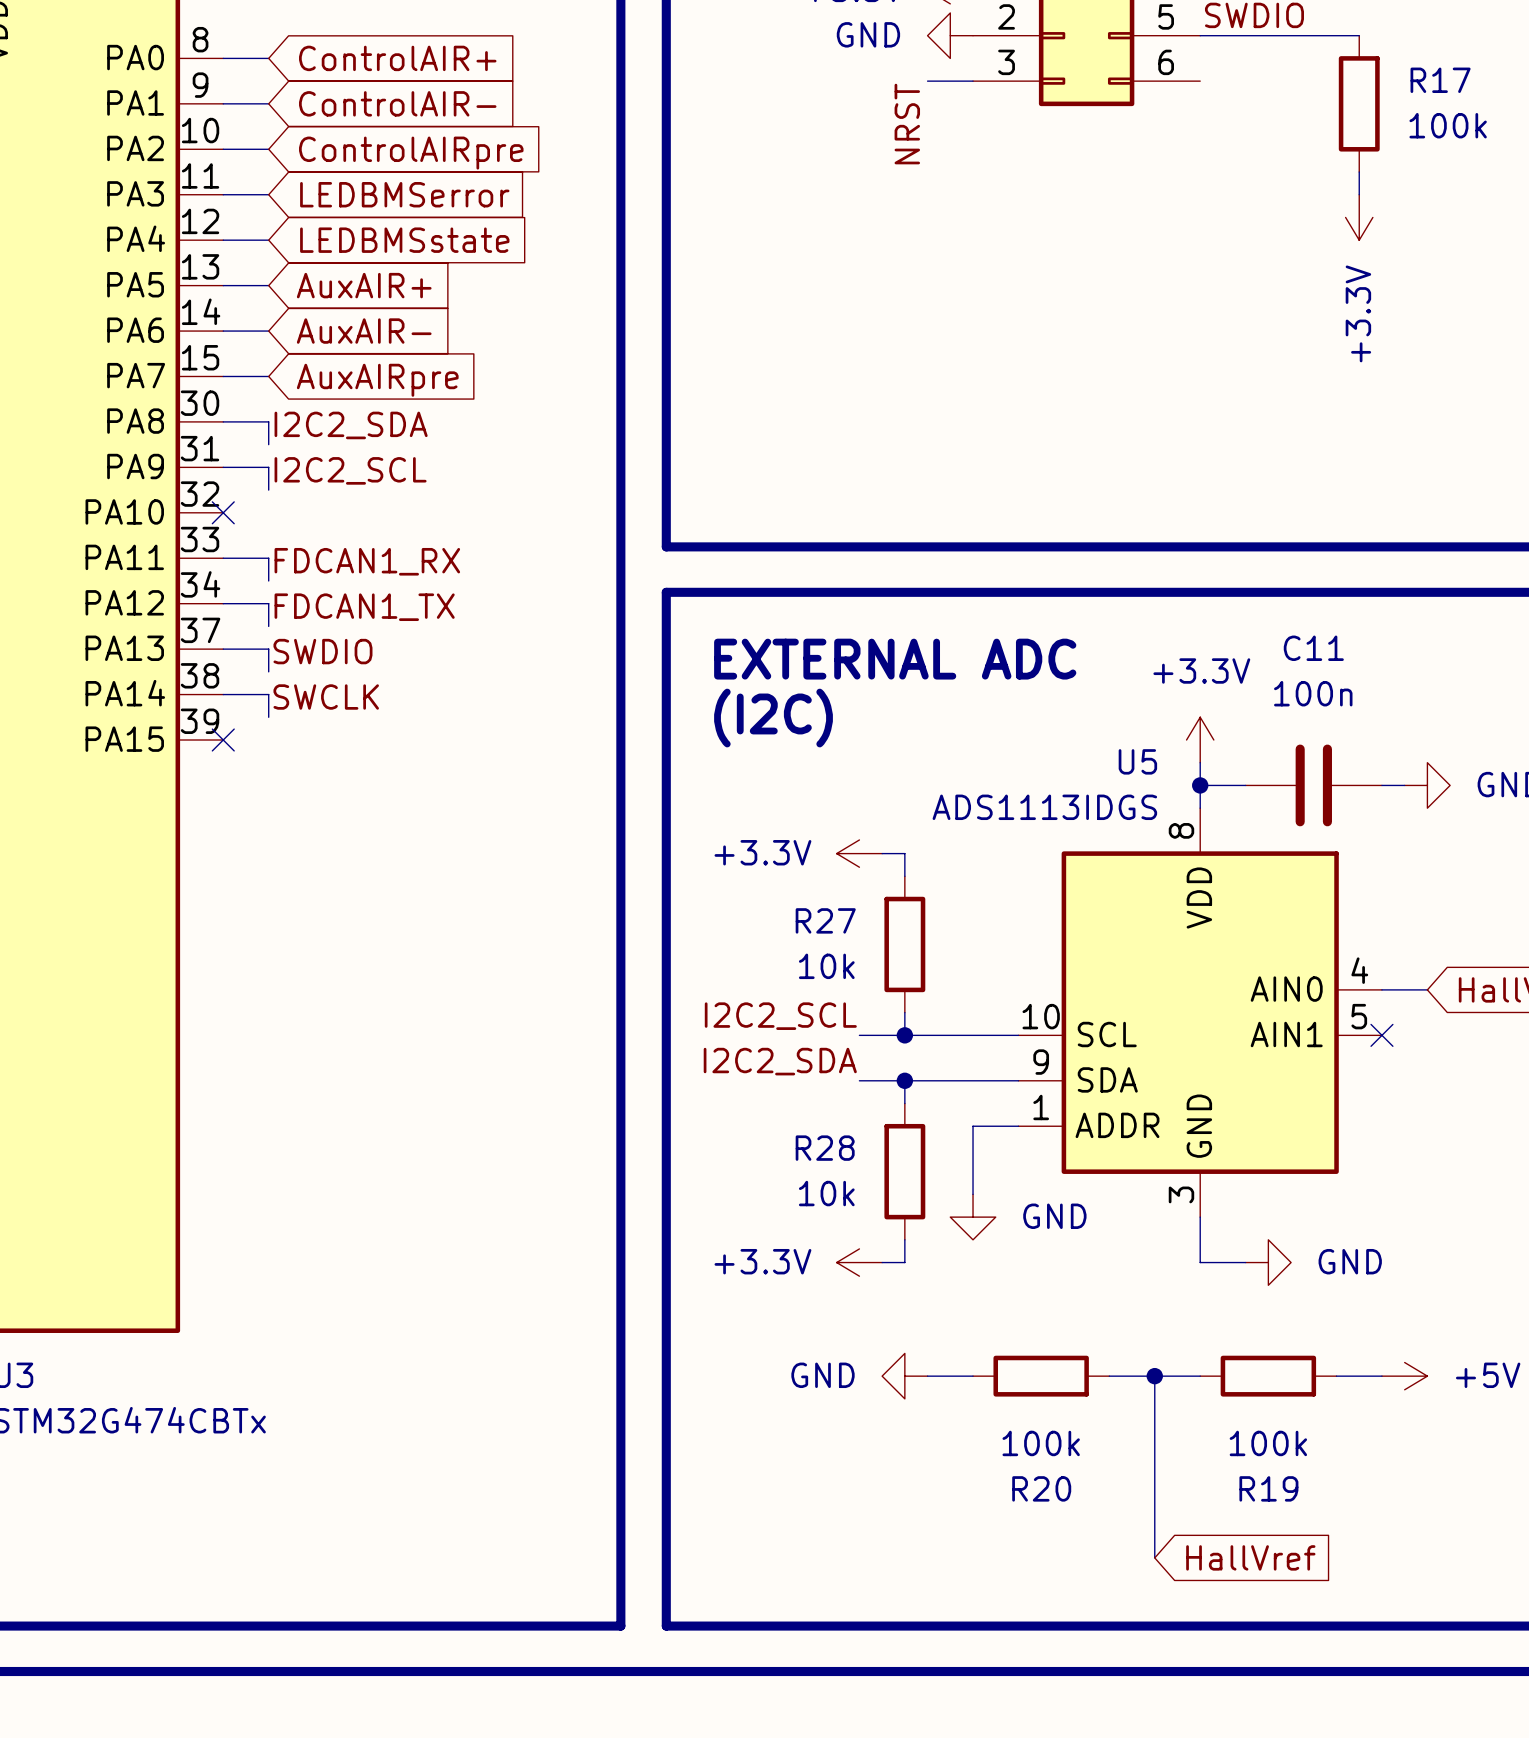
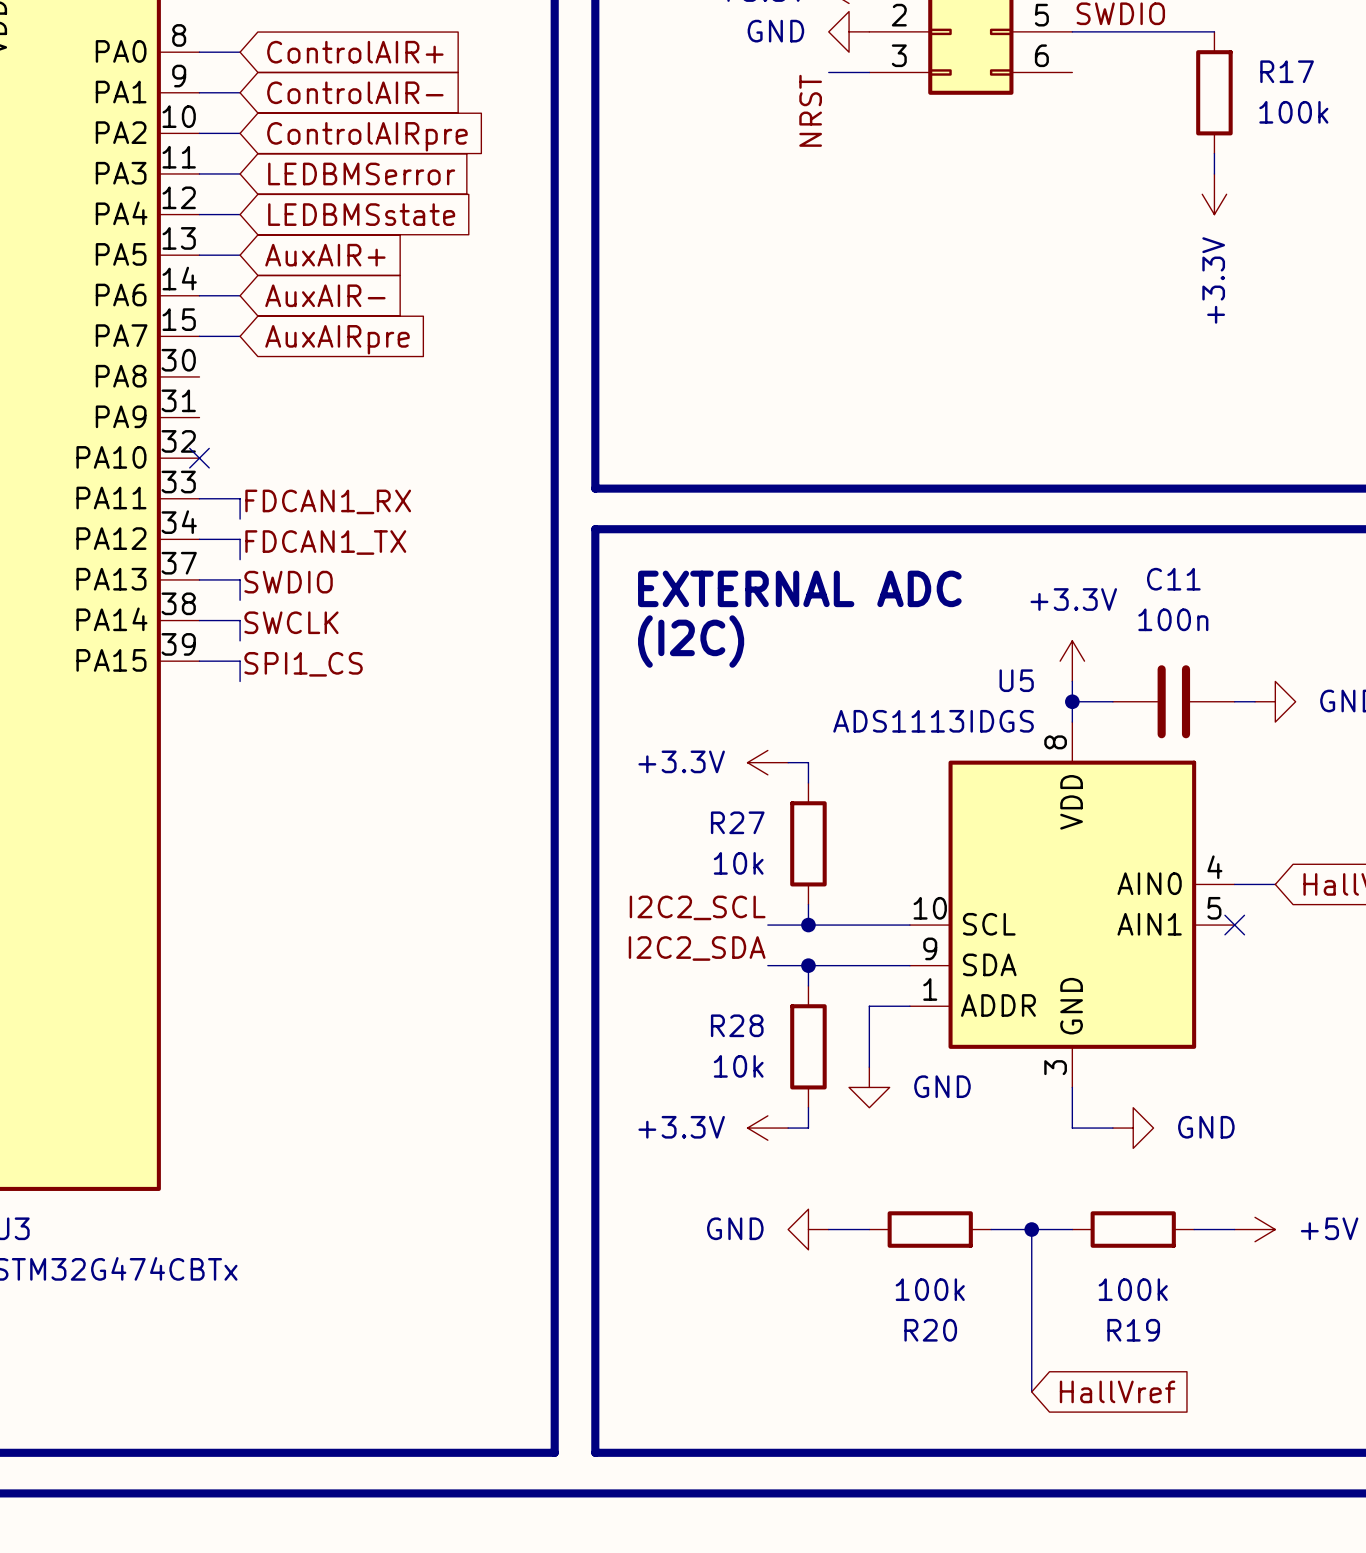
wire: (223, 421) (268, 421) (268, 444) -> none
label: I2C2_SDA (351, 425) -> none
wire: (223, 467) (268, 467) (268, 490) -> (199, 661) (240, 661) (240, 681)
label: I2C2_SCL (350, 470) -> none
no-connect mark: (223, 740) -> none
label: none -> SPI1_CS (303, 664)

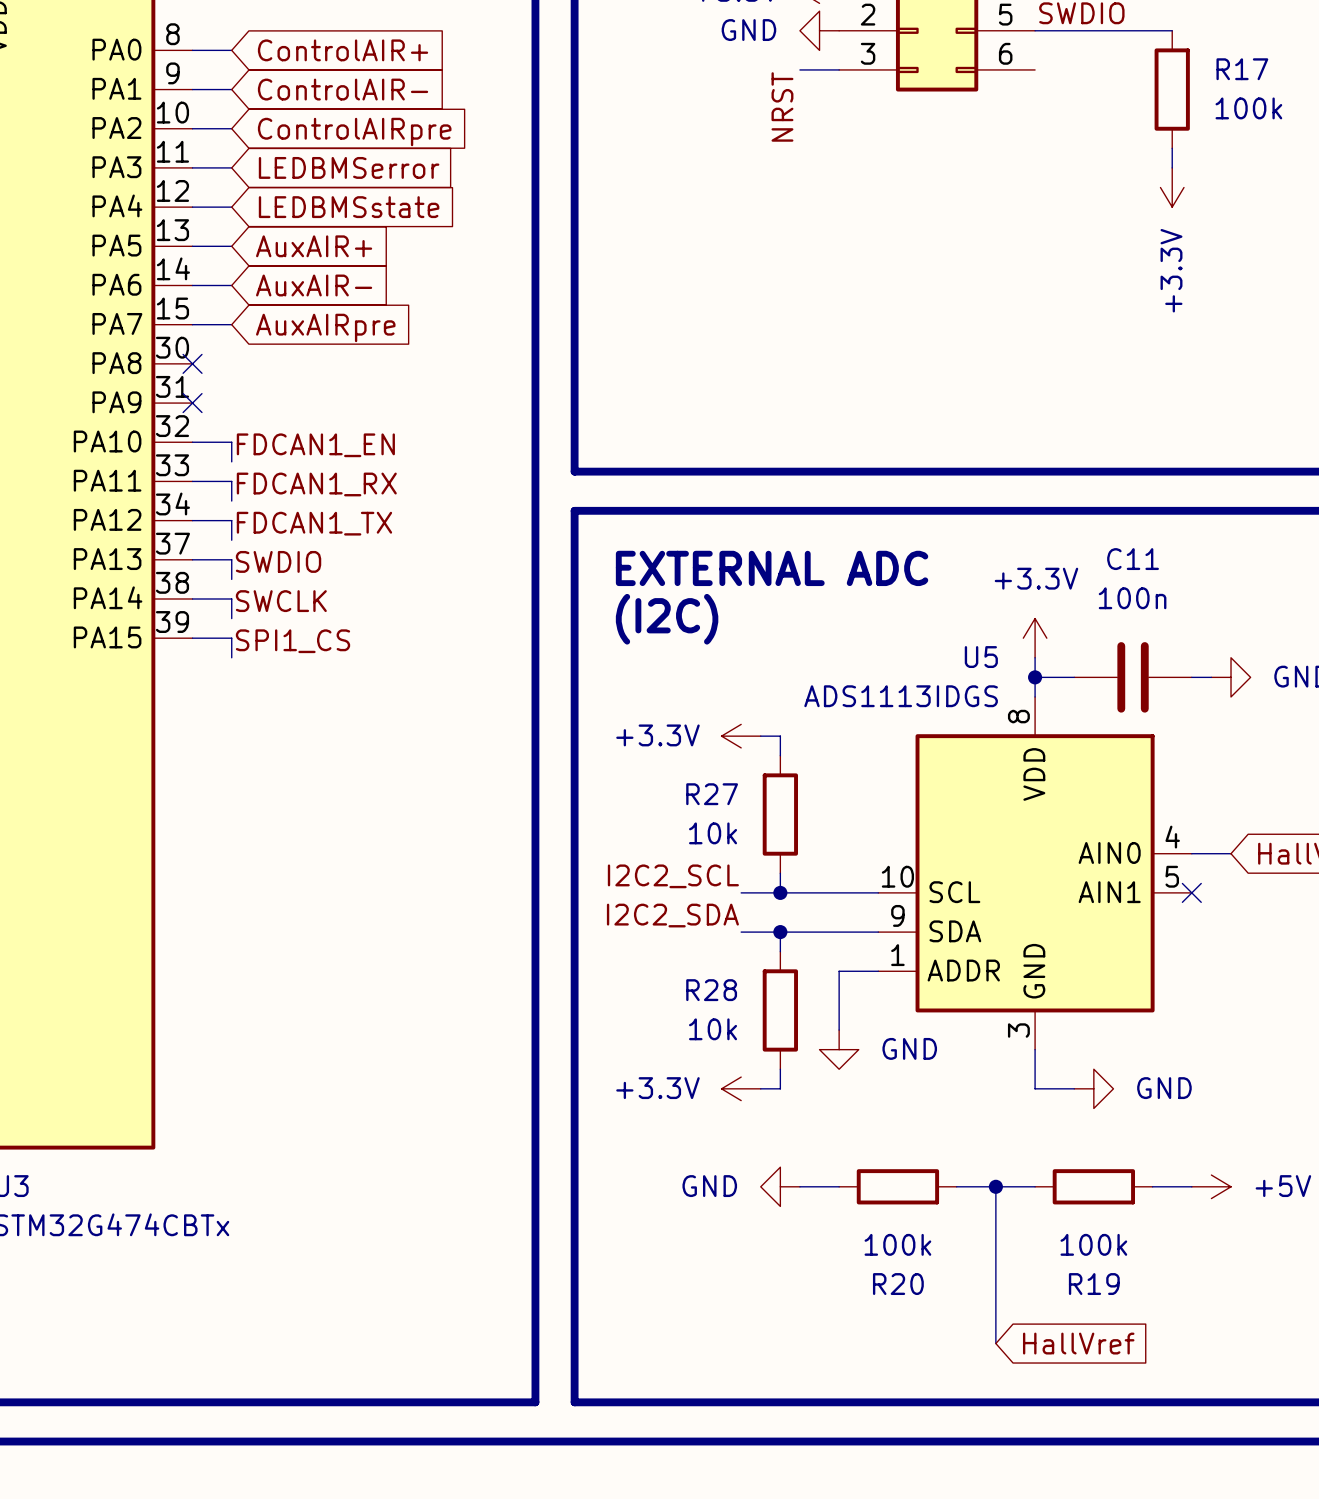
no-connect mark: none -> (192, 363)
no-connect mark: none -> (192, 403)
wire: none -> (192, 442) (231, 442) (231, 461)
no-connect mark: (199, 458) -> none
label: none -> FDCAN1_EN (315, 445)

